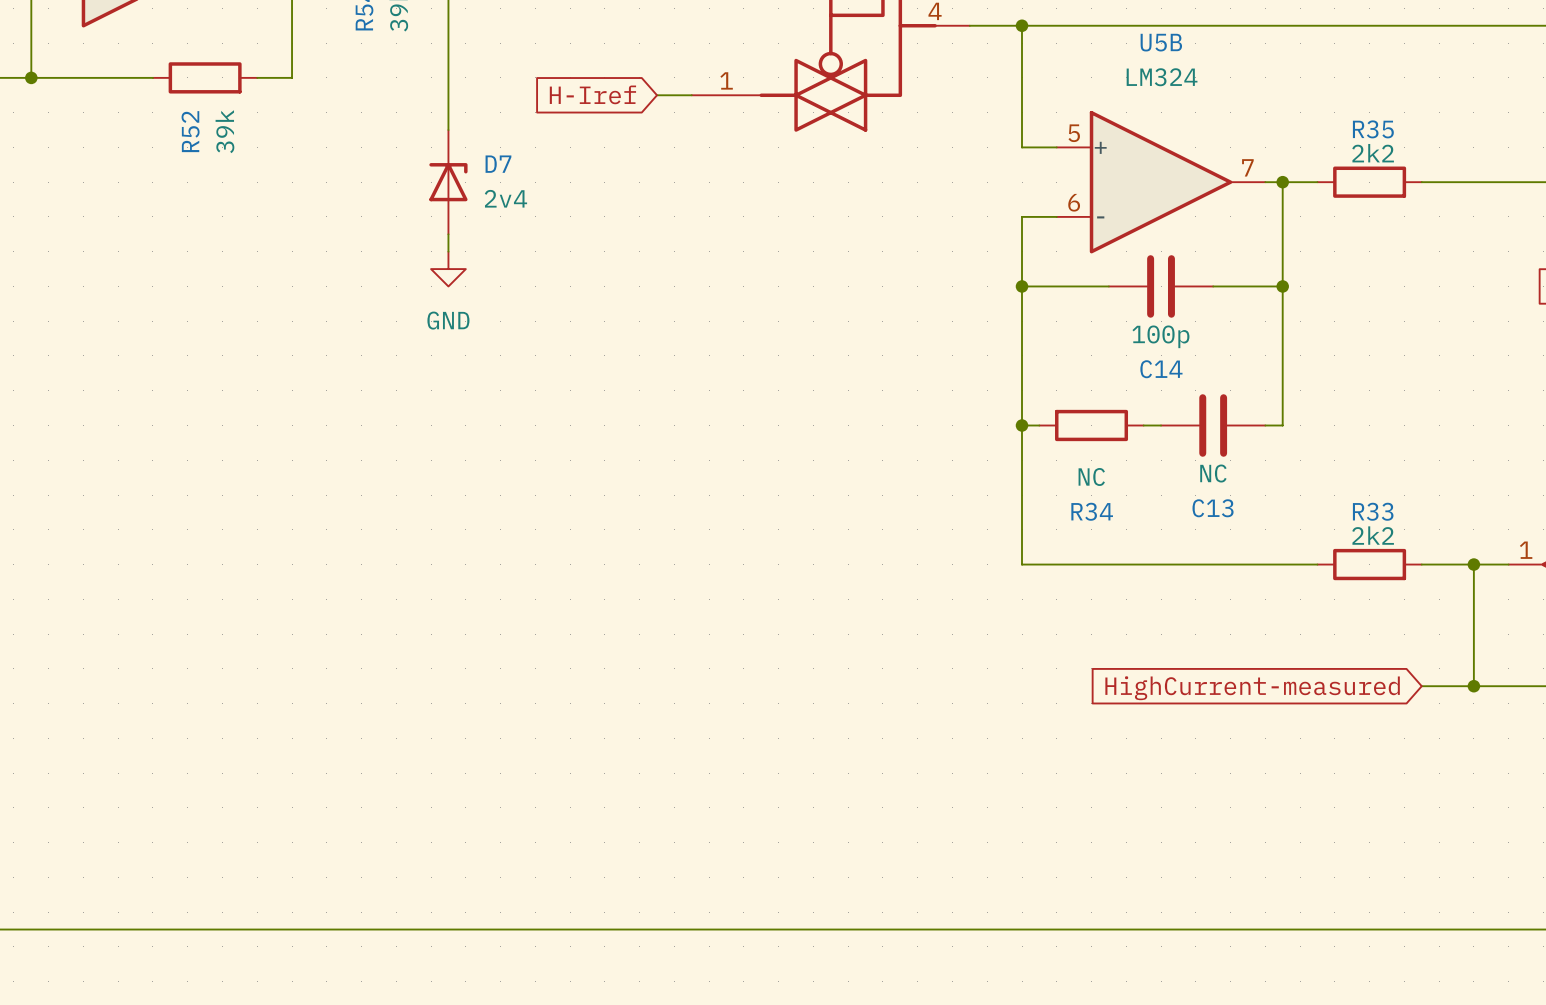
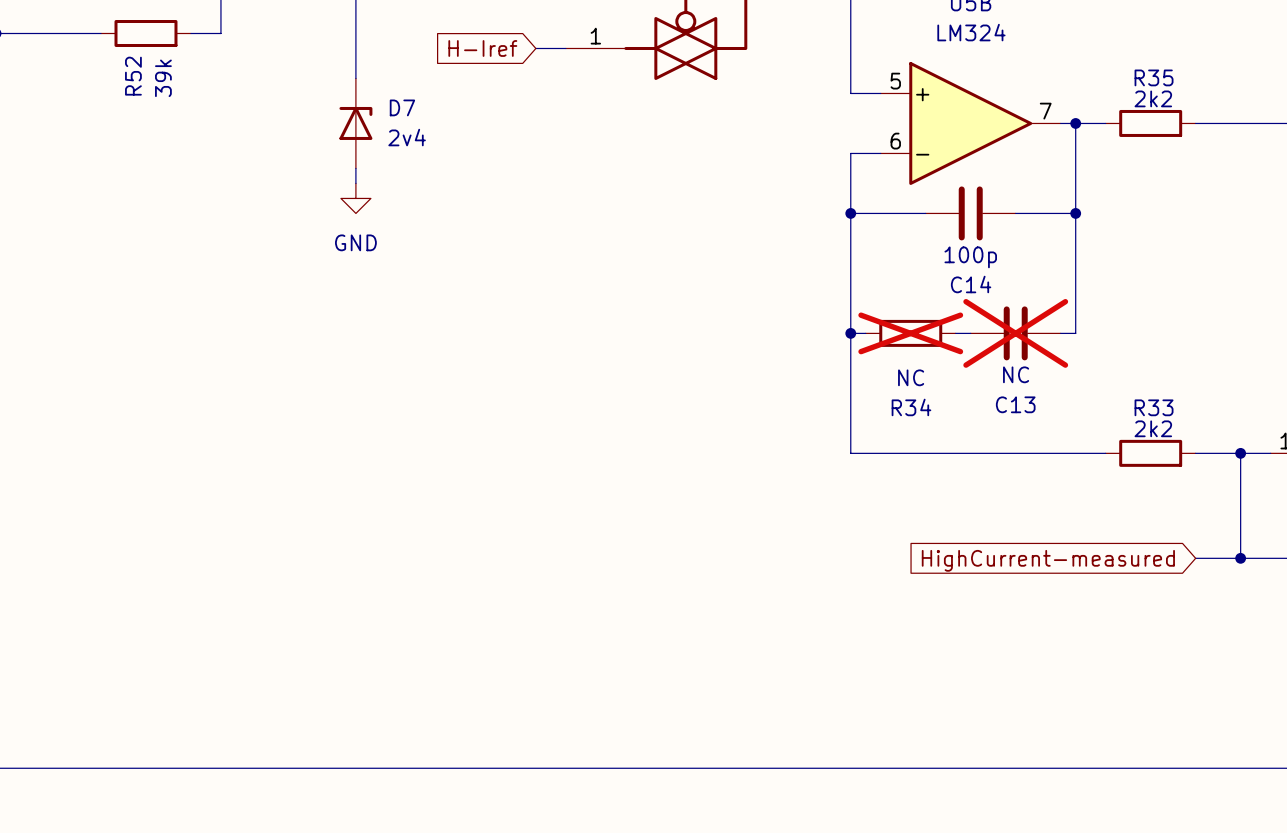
R34 do-not-place cross: none -> (910, 333)
C13 do-not-place cross: none -> (1015, 333)

